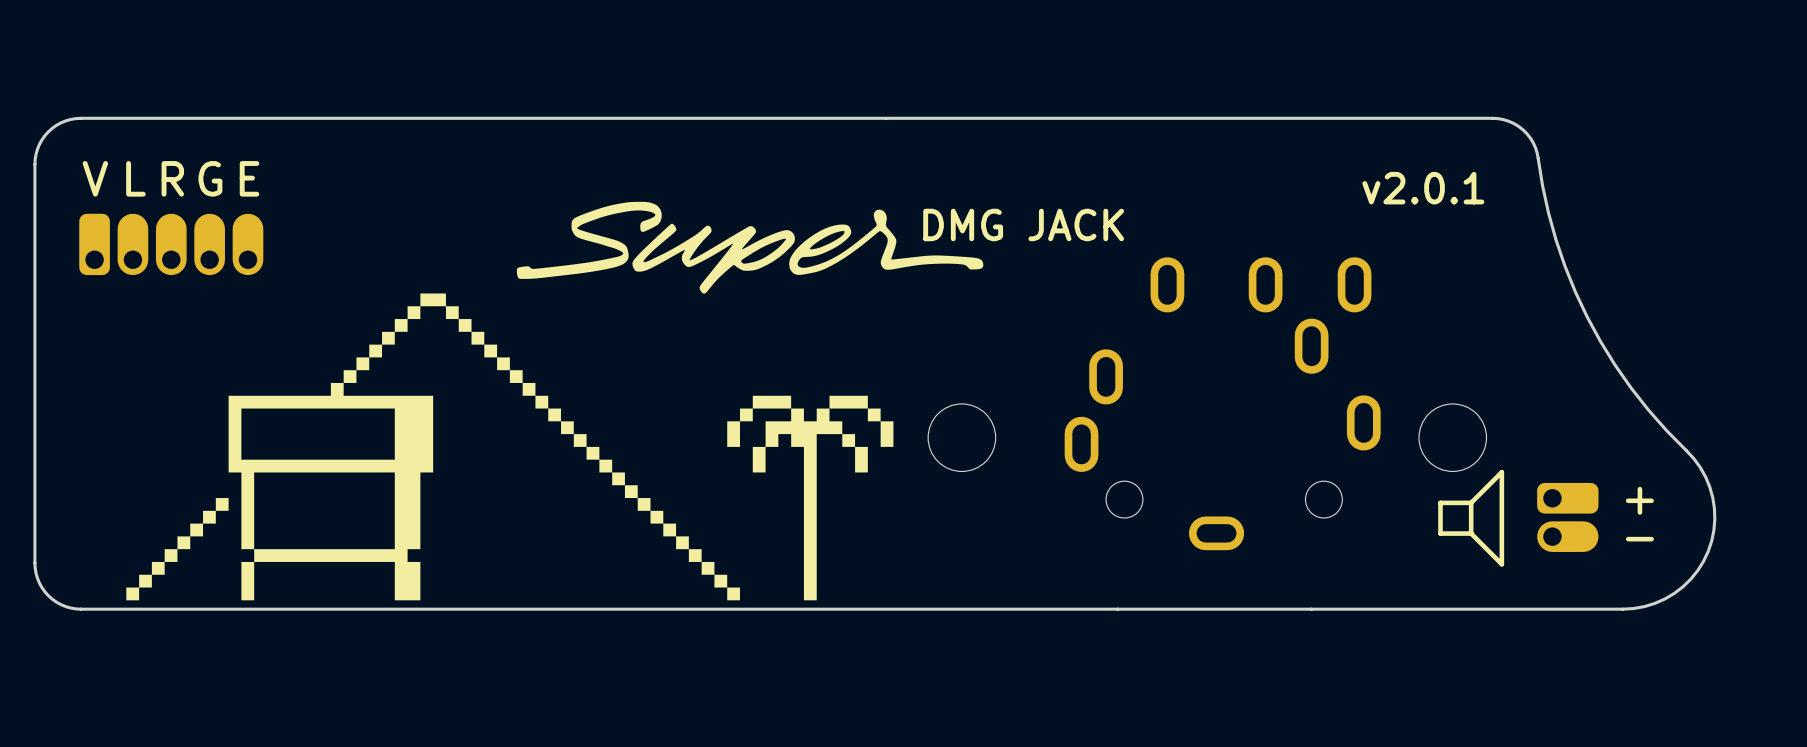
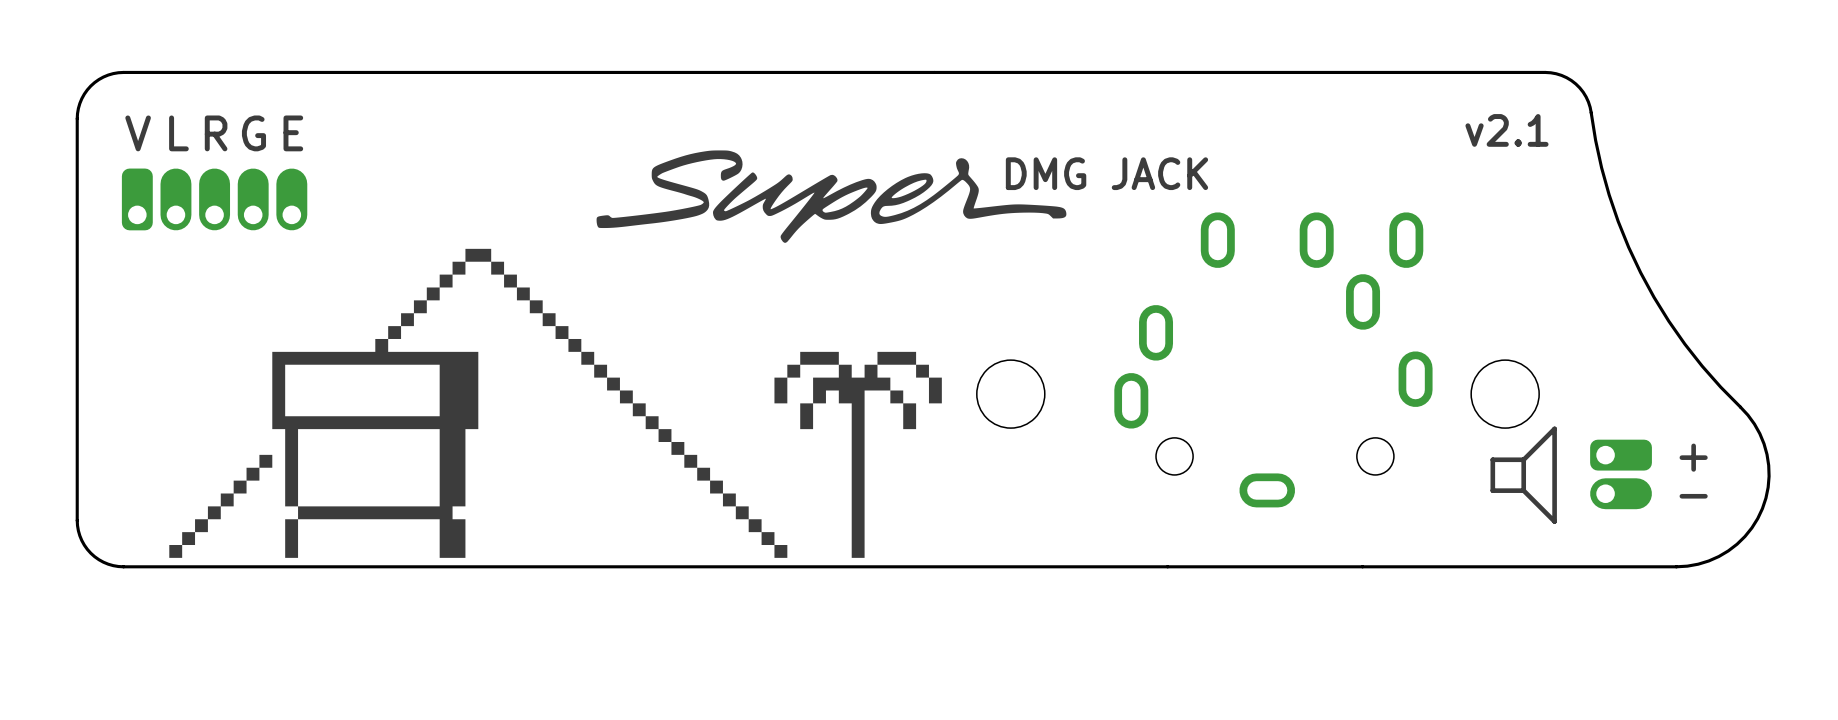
text: v2.0.1 (1423, 188) -> v2.1 (1506, 130)
text position: DMG JACK (1023, 224) -> DMG JACK (1106, 173)
drawing position: (750, 247) -> (831, 196)

